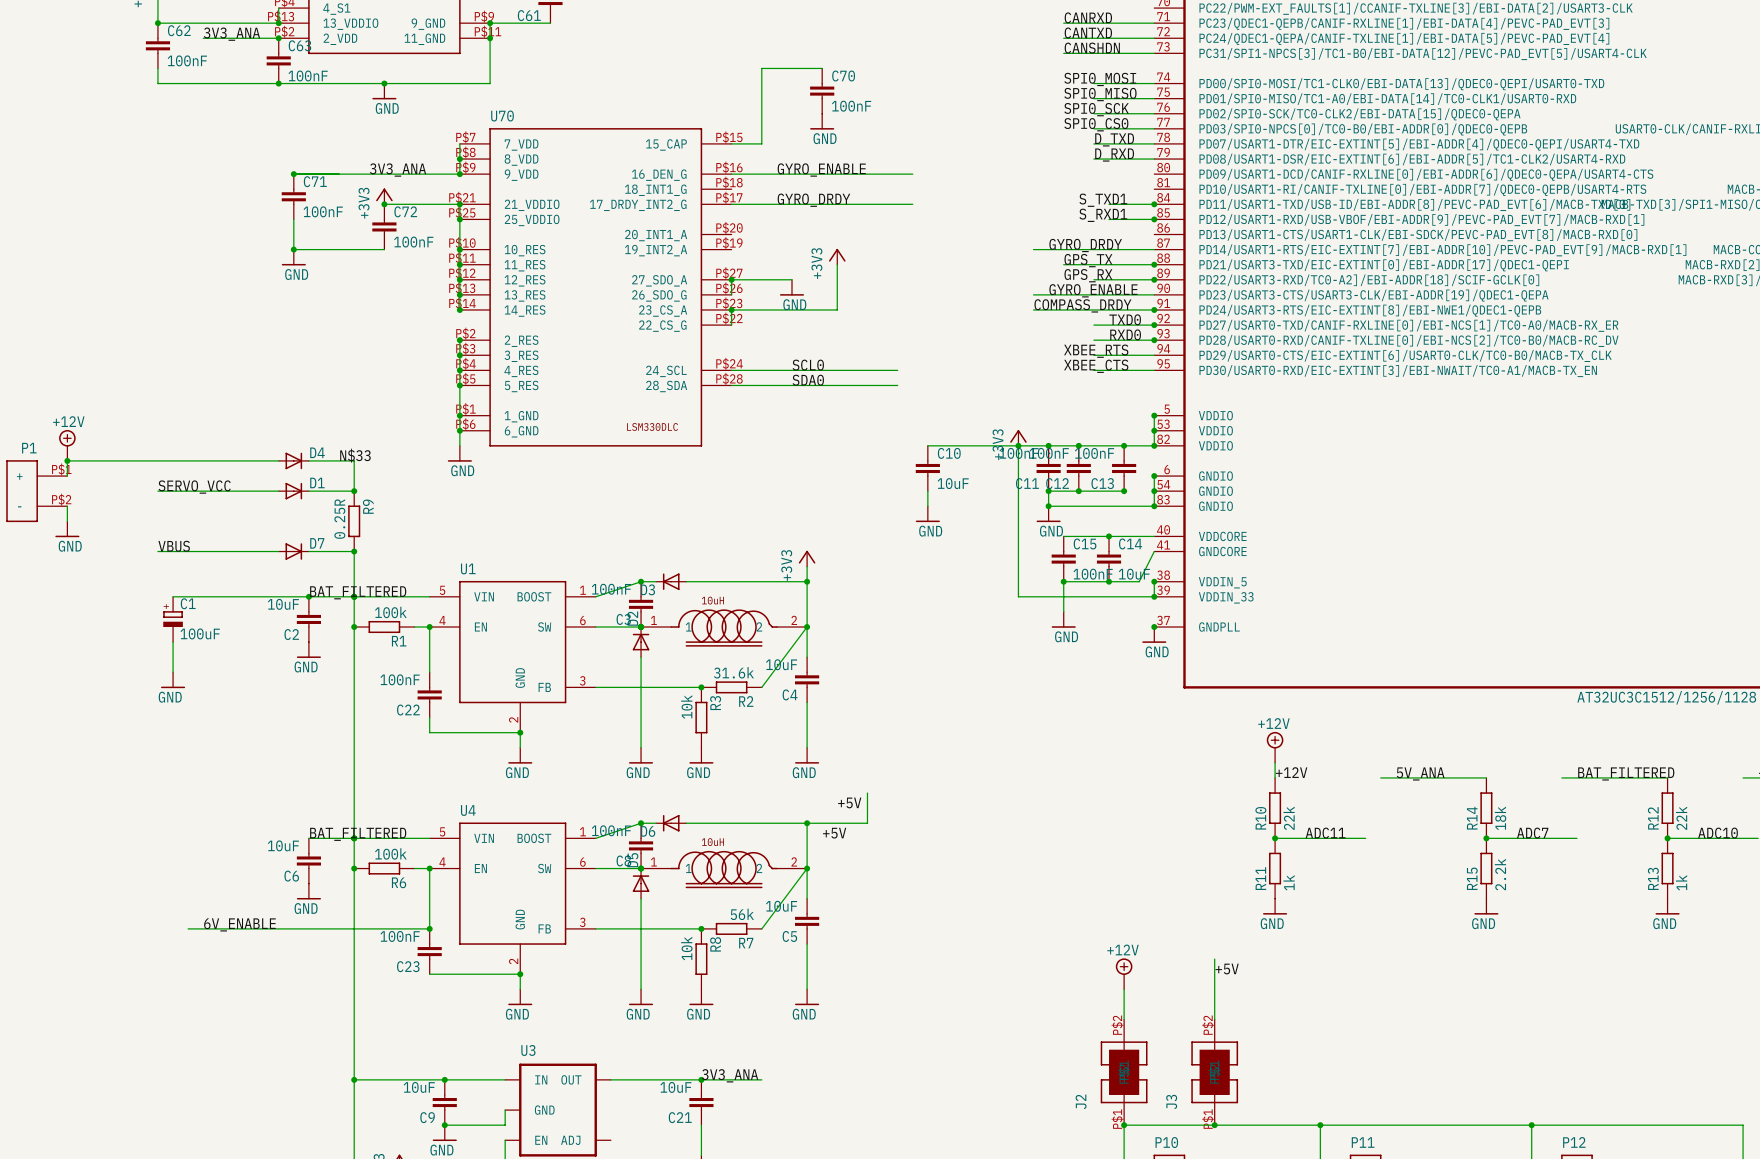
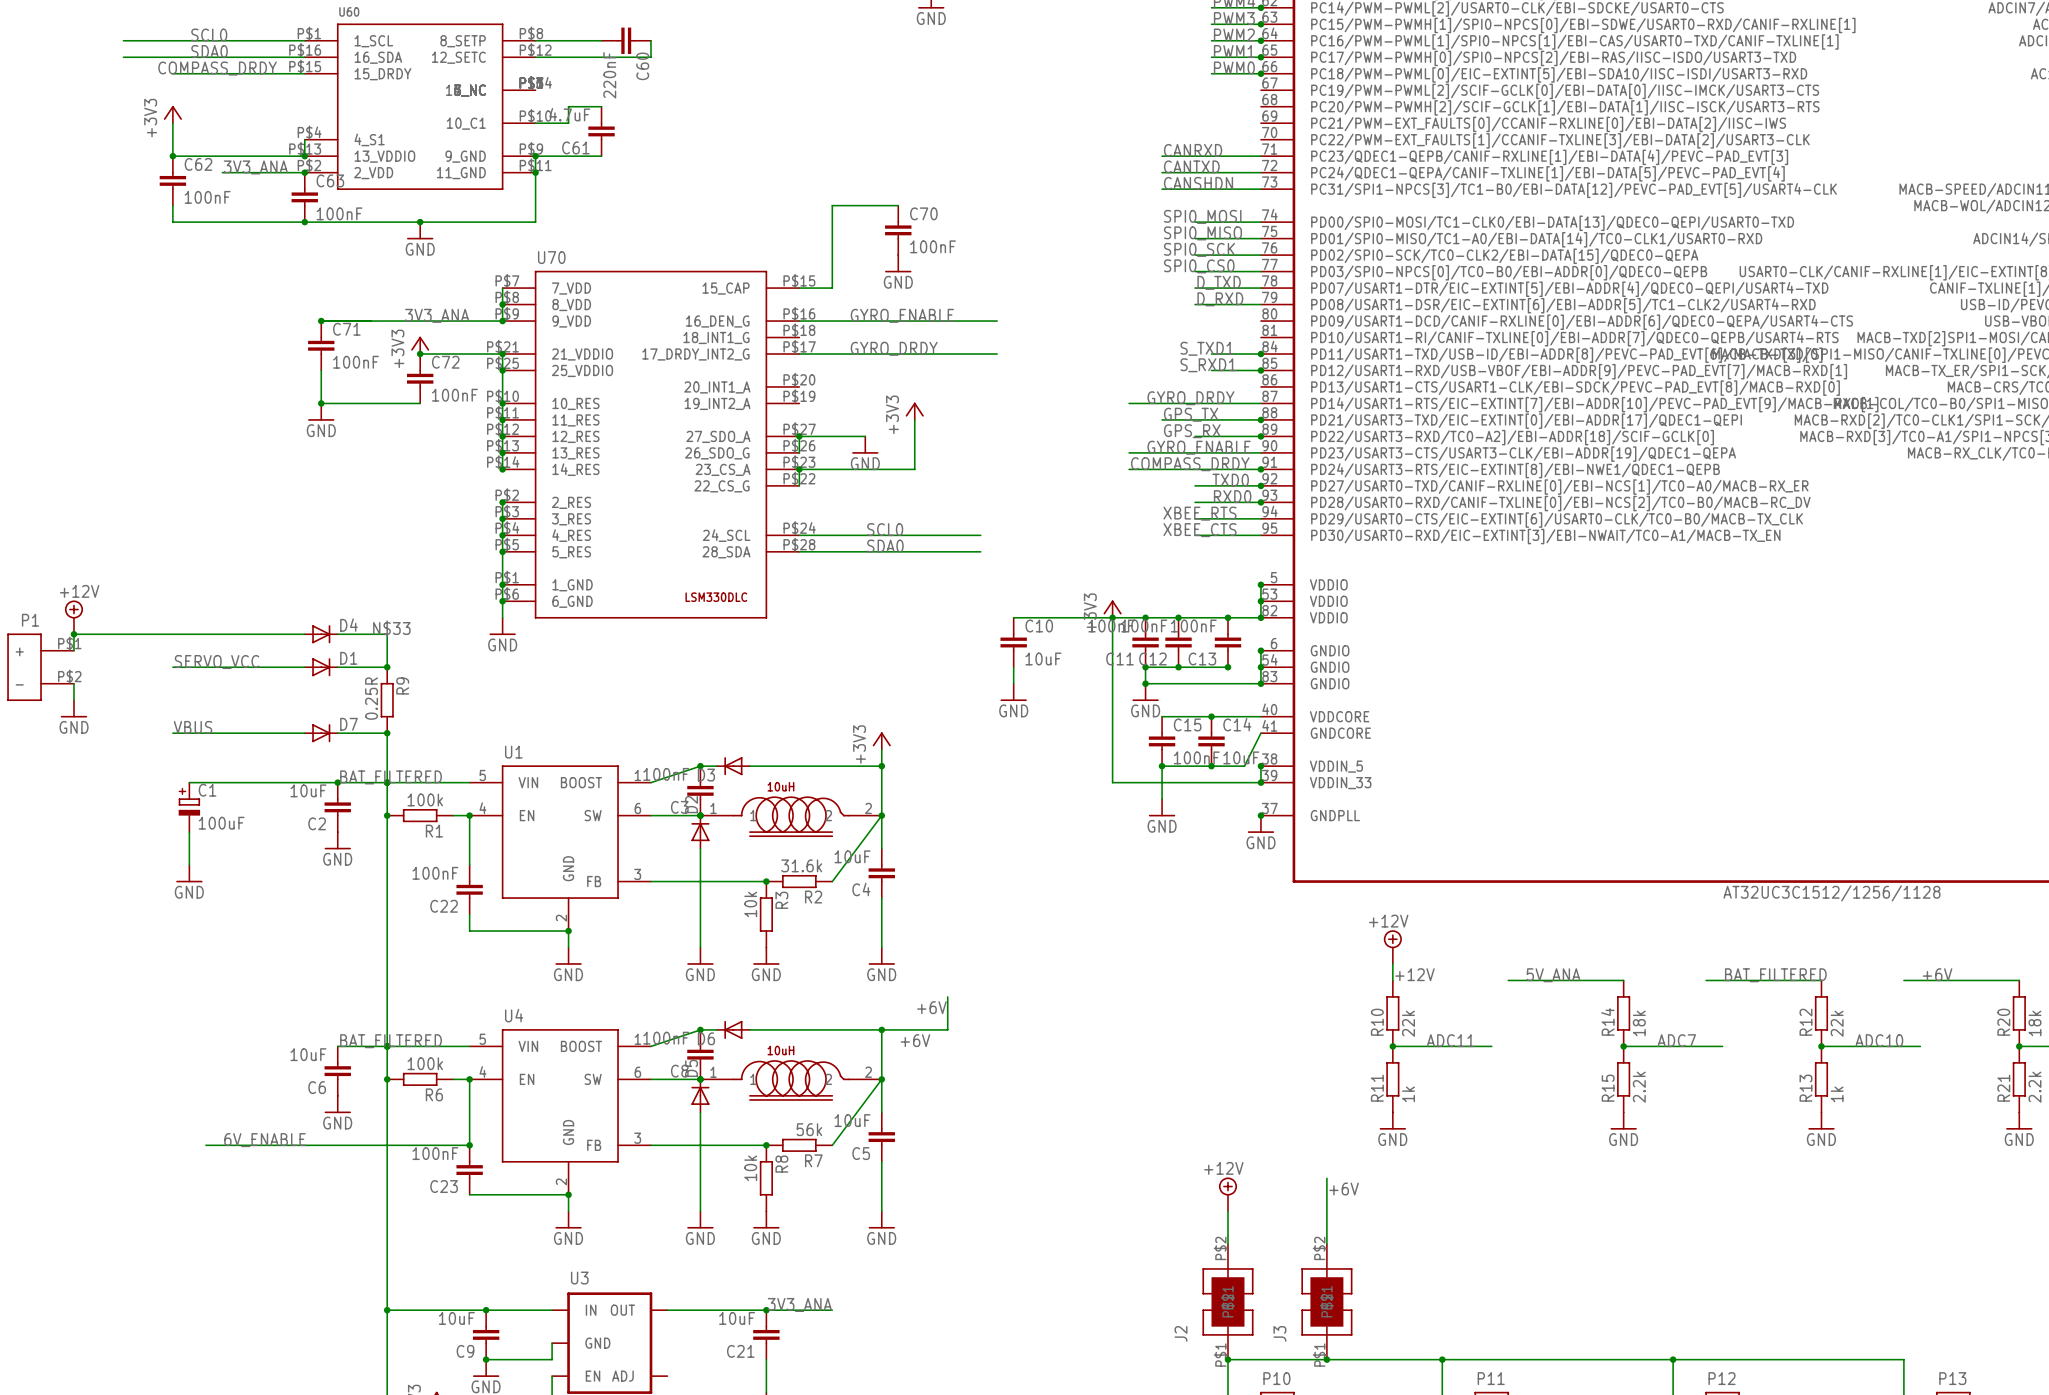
label: +5V (849, 802) -> +6V (931, 1007)
label: +5V (834, 833) -> +6V (915, 1040)
label: +5V (1227, 969) -> +6V (1344, 1189)

